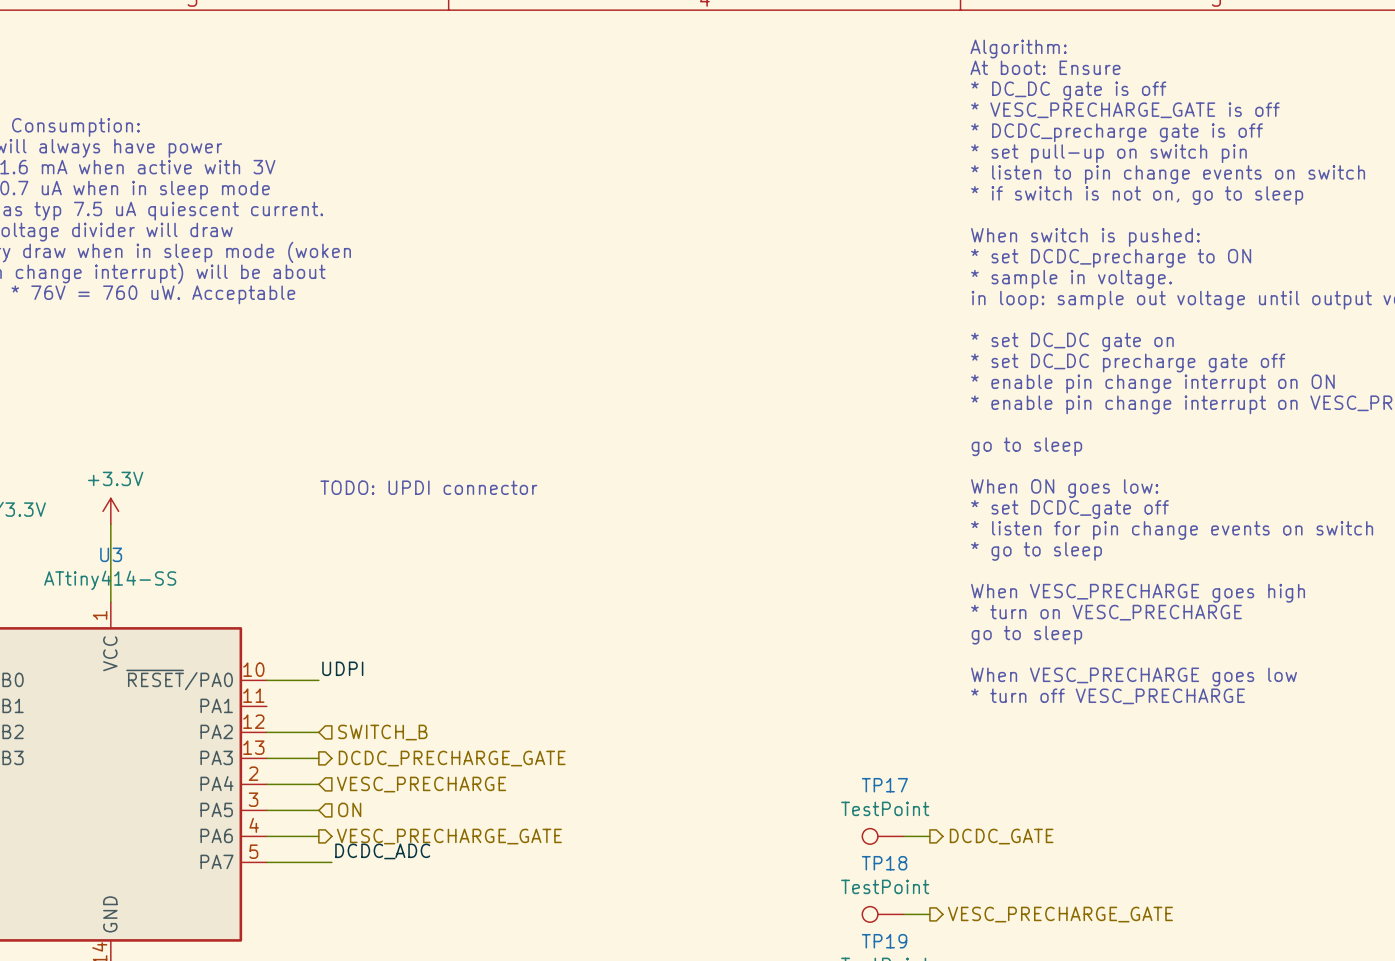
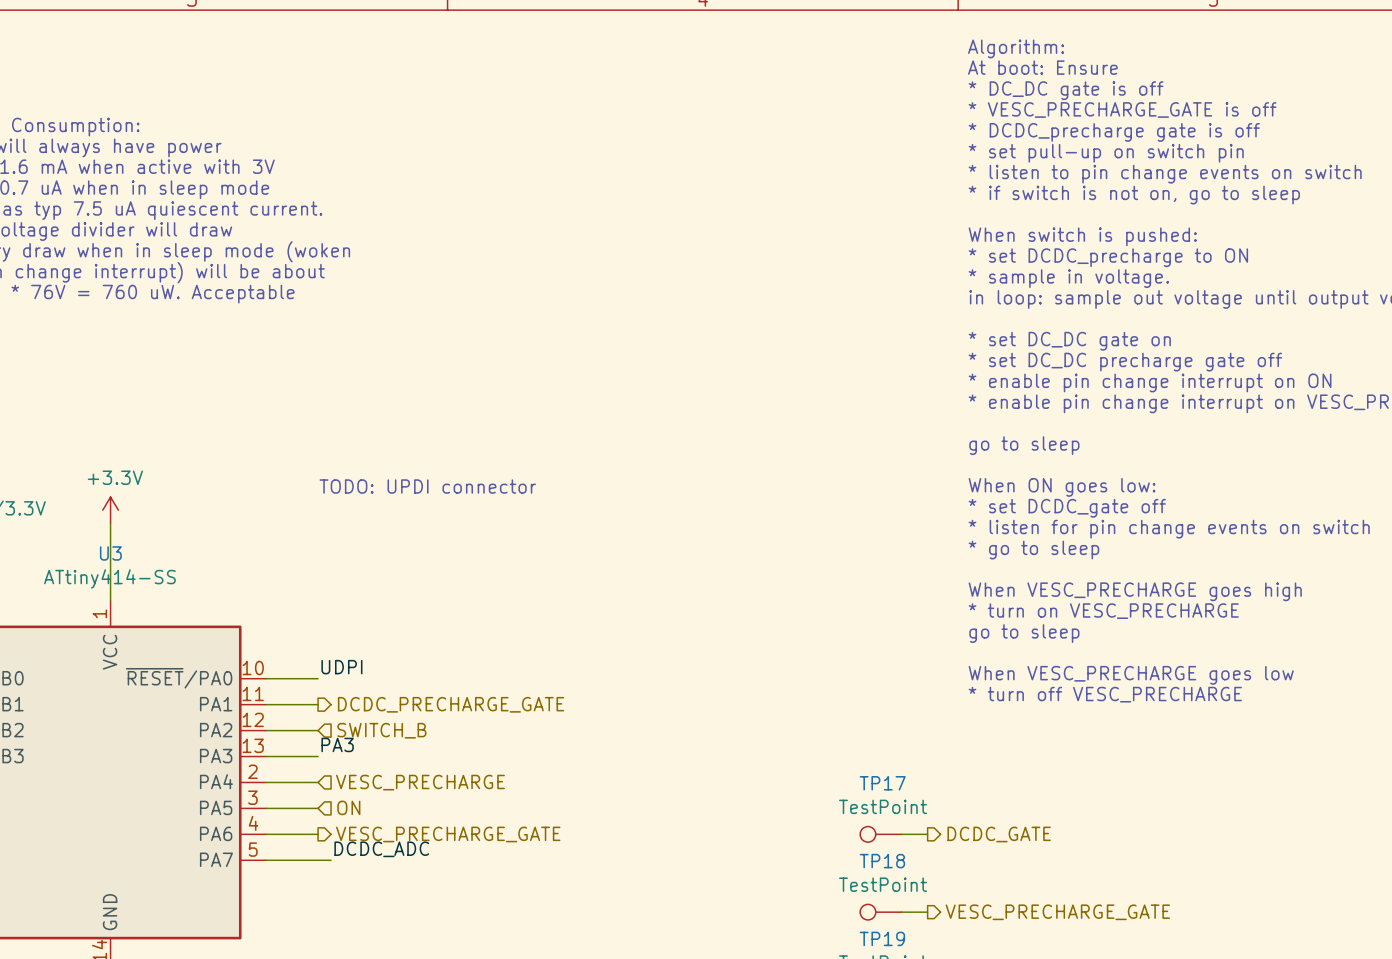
wire: none -> (266, 704) (318, 704)
label: none -> PA3 (337, 744)
hierarchical label position: DCDC_PRECHARGE_GATE (452, 758) -> DCDC_PRECHARGE_GATE (451, 704)

